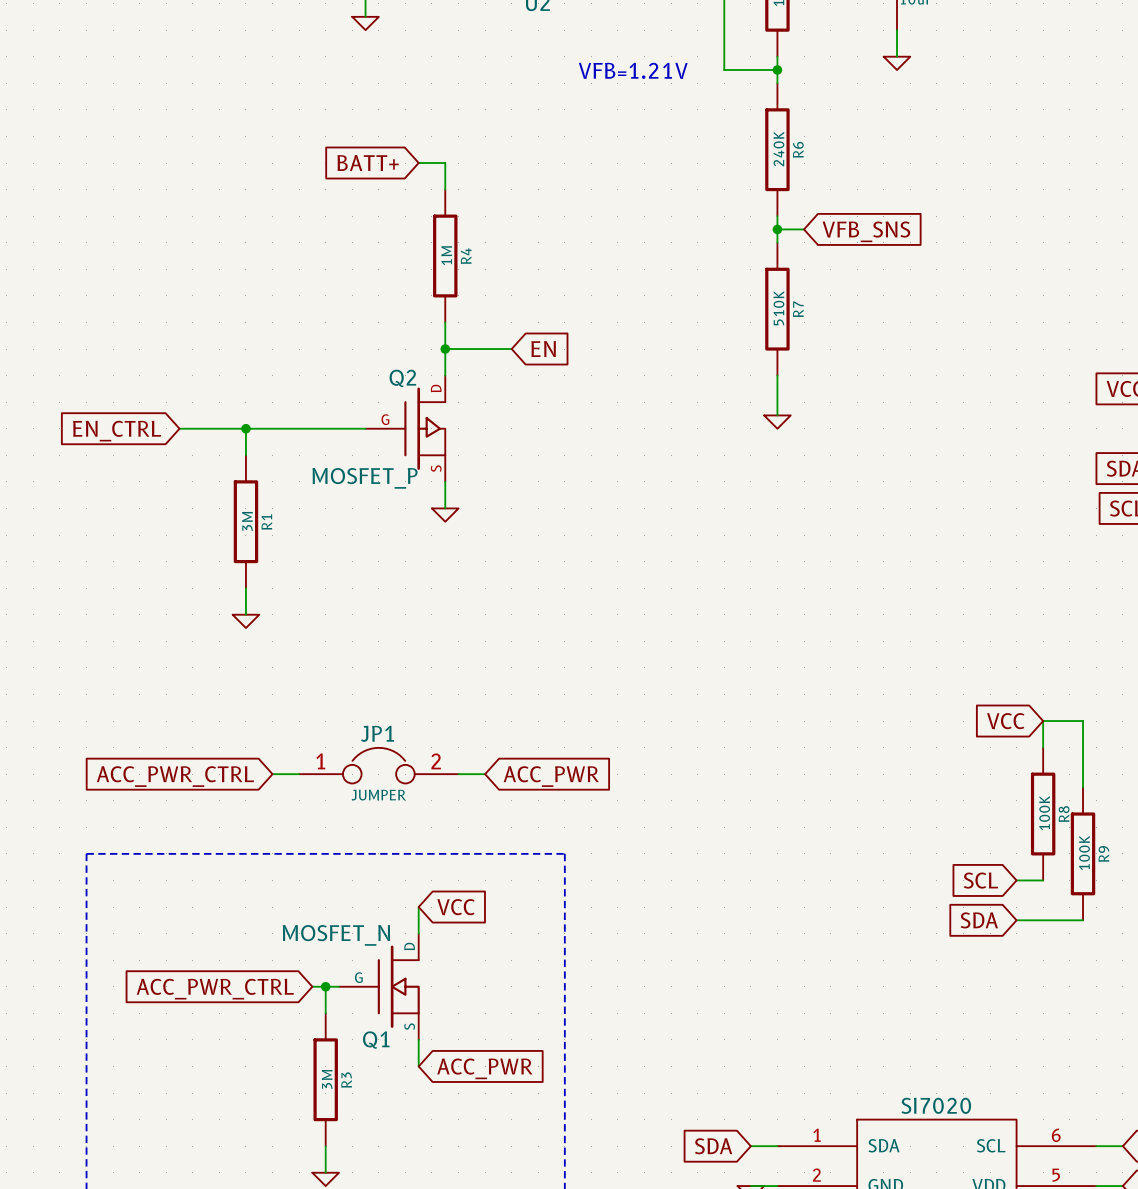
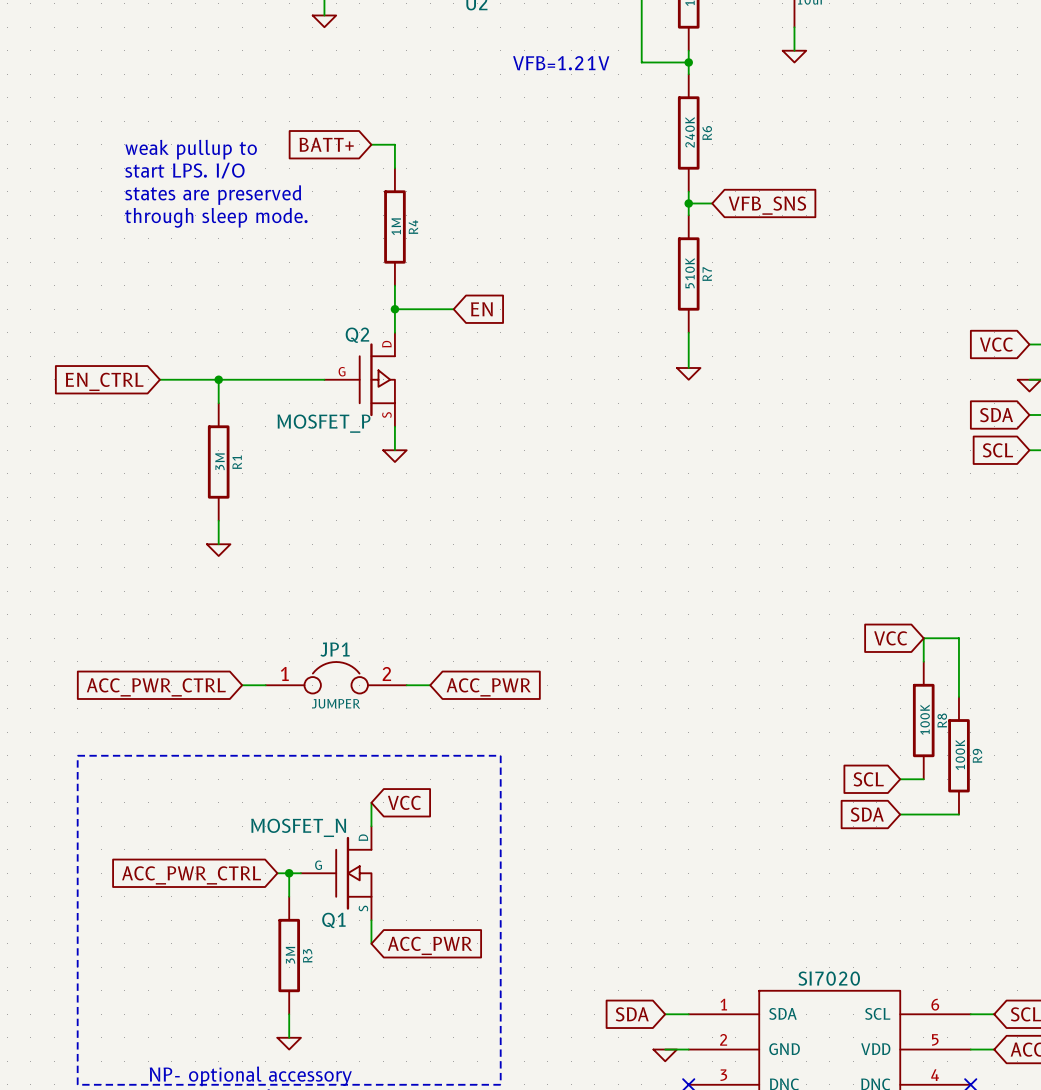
text: none -> weak pullup to (191, 149)
text: none -> start LPS. I/O (184, 170)
text: none -> states are preserved (213, 195)
text: none -> through sleep mode. (216, 217)

